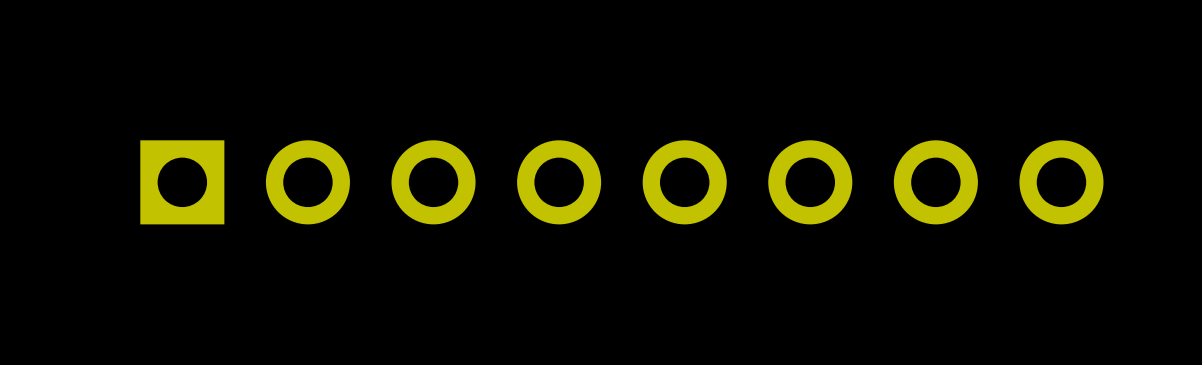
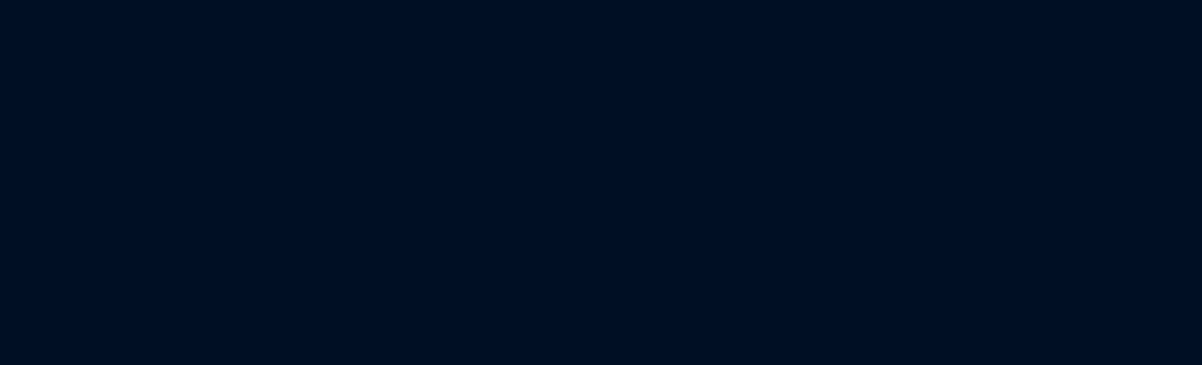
part: (621, 182) -> none

